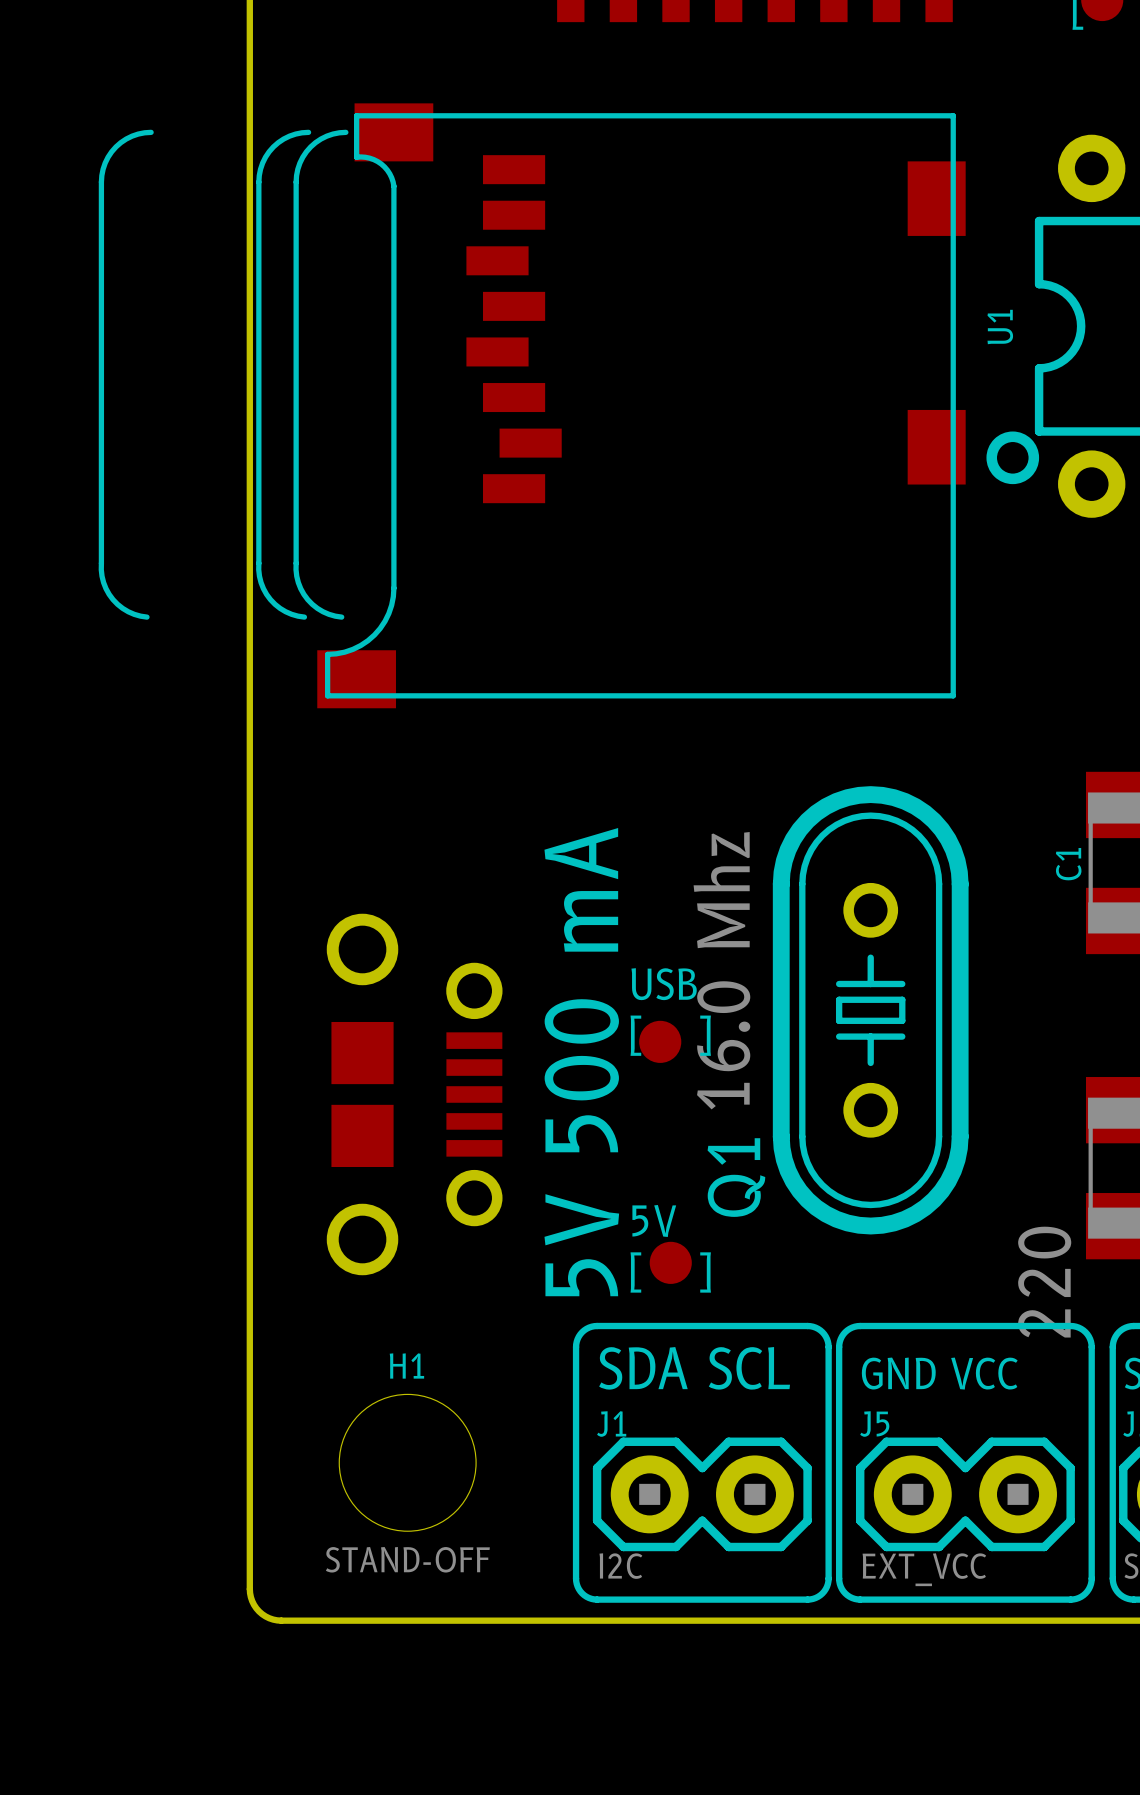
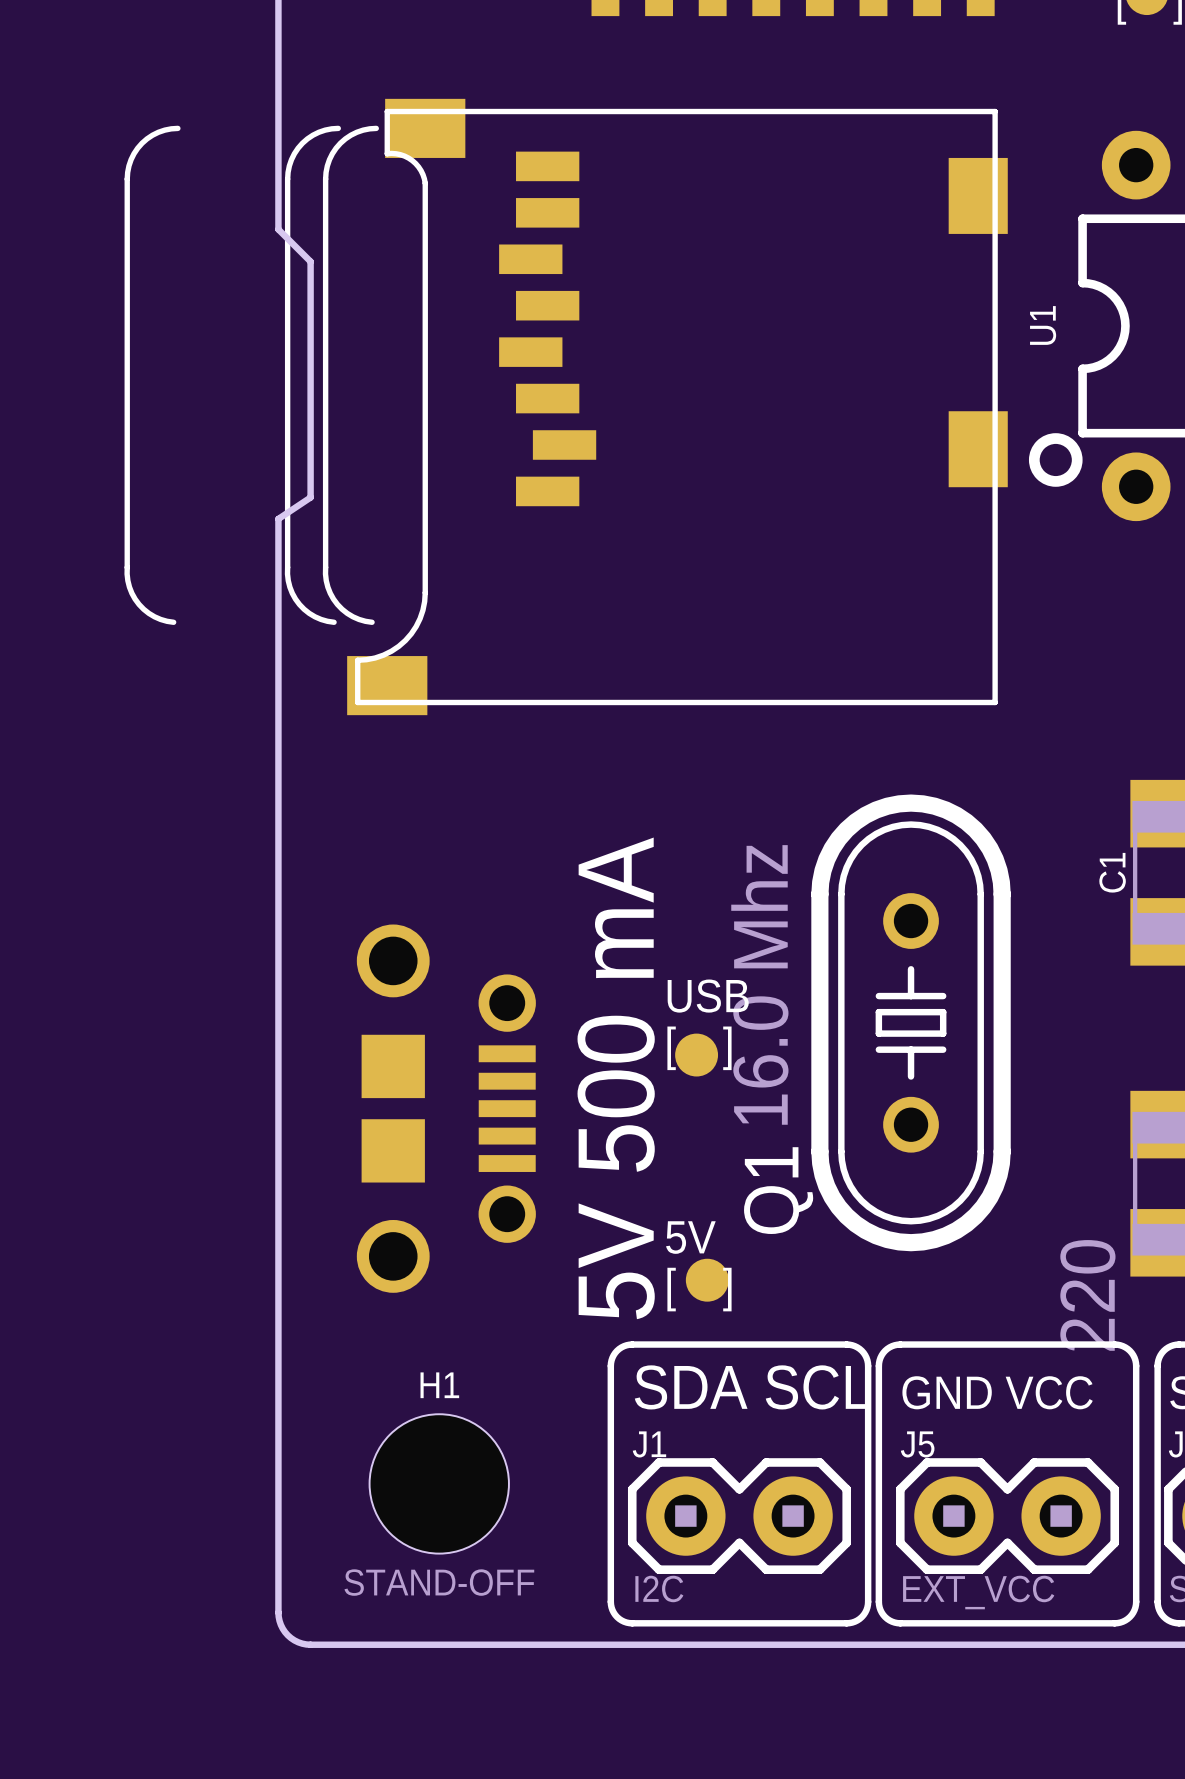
board edge: (249, 231) (249, 515) -> (278, 229) (310, 261) (310, 497) (278, 518)

